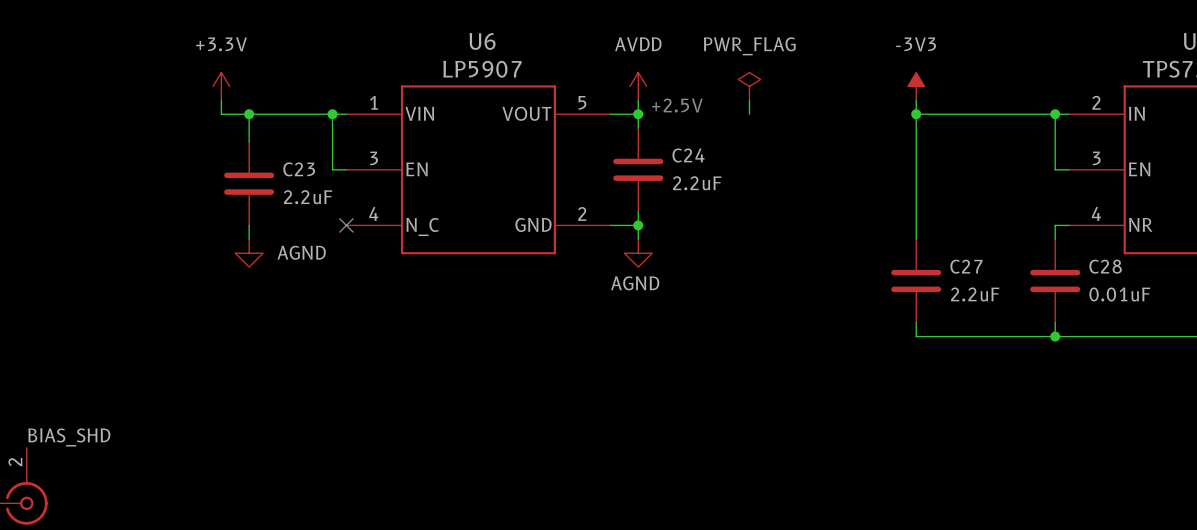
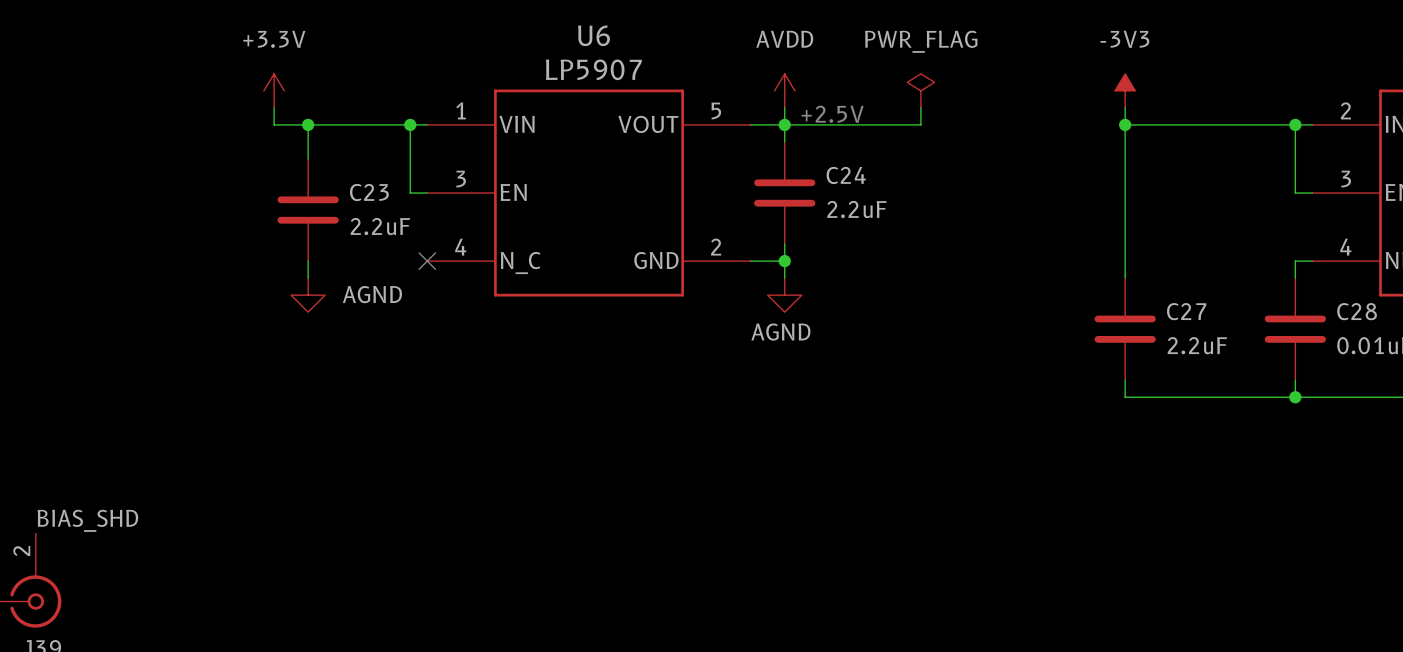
wire: none -> (784, 124) (920, 124)

